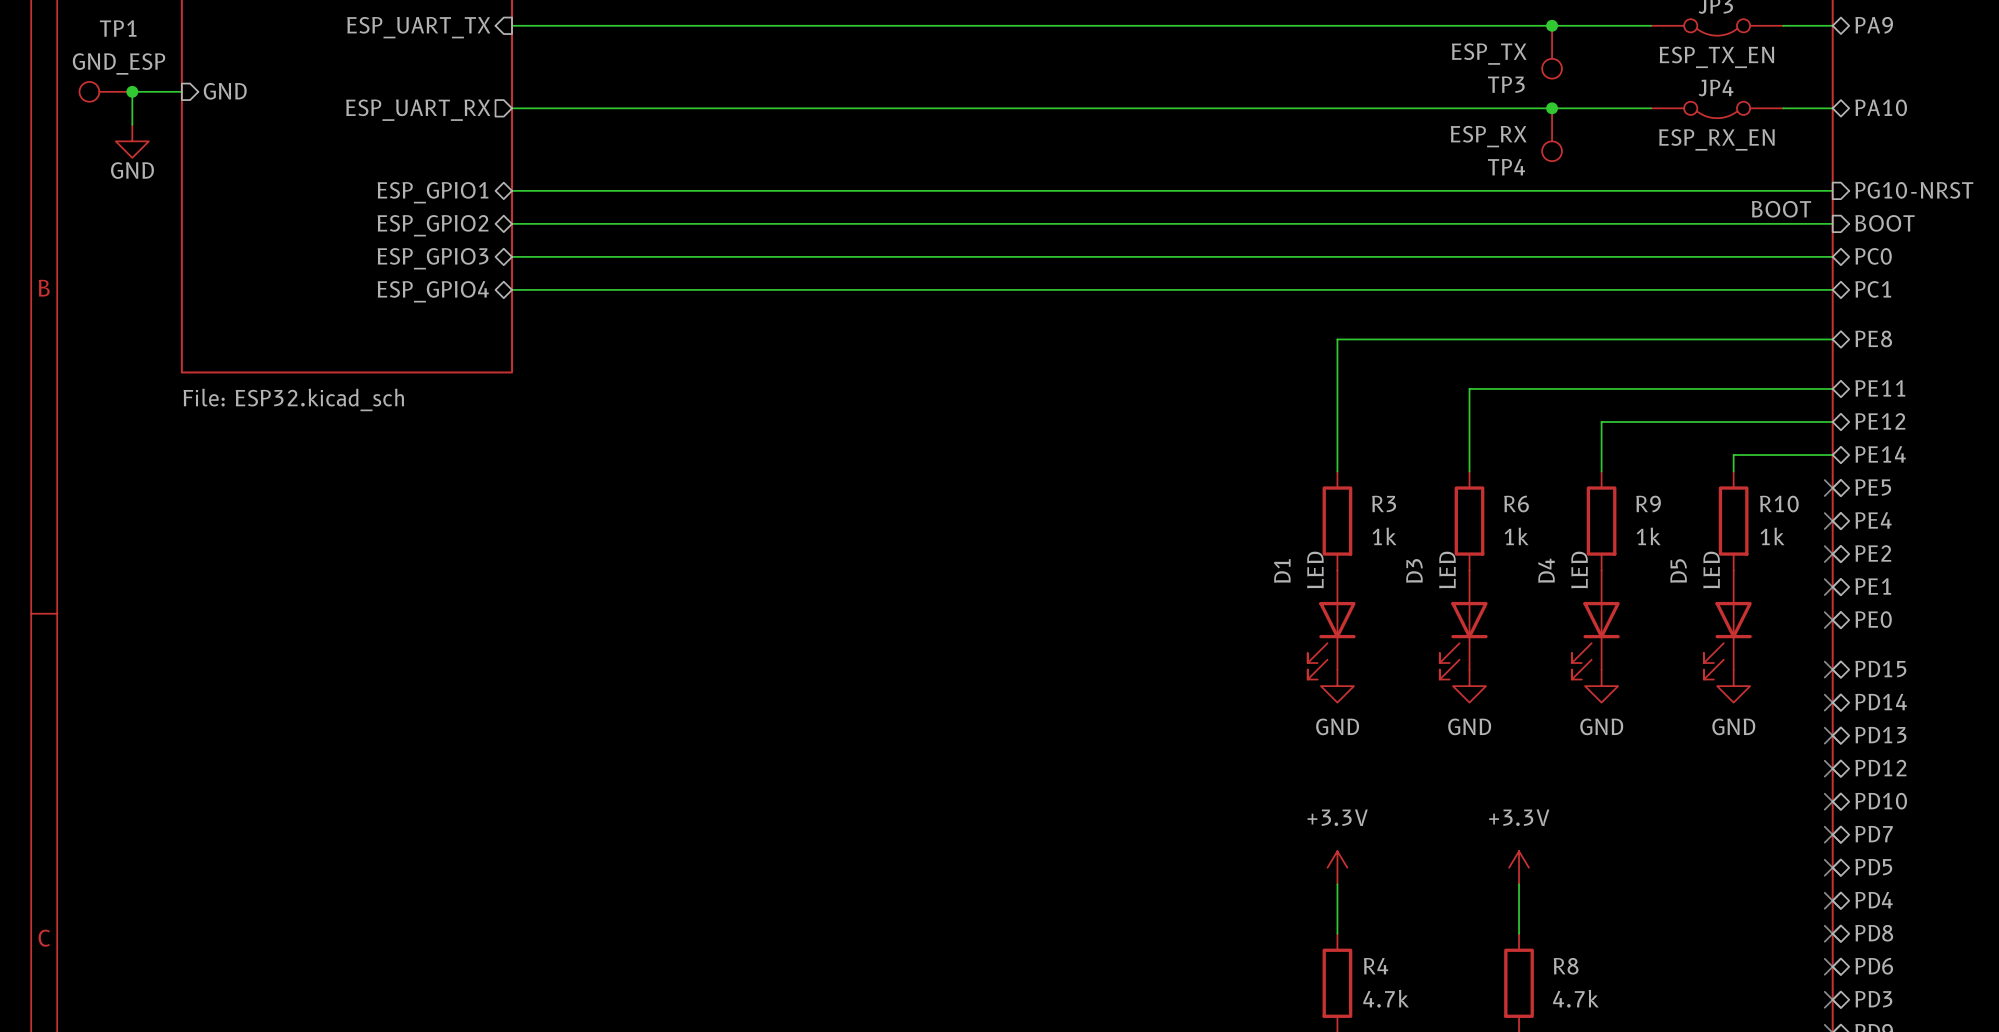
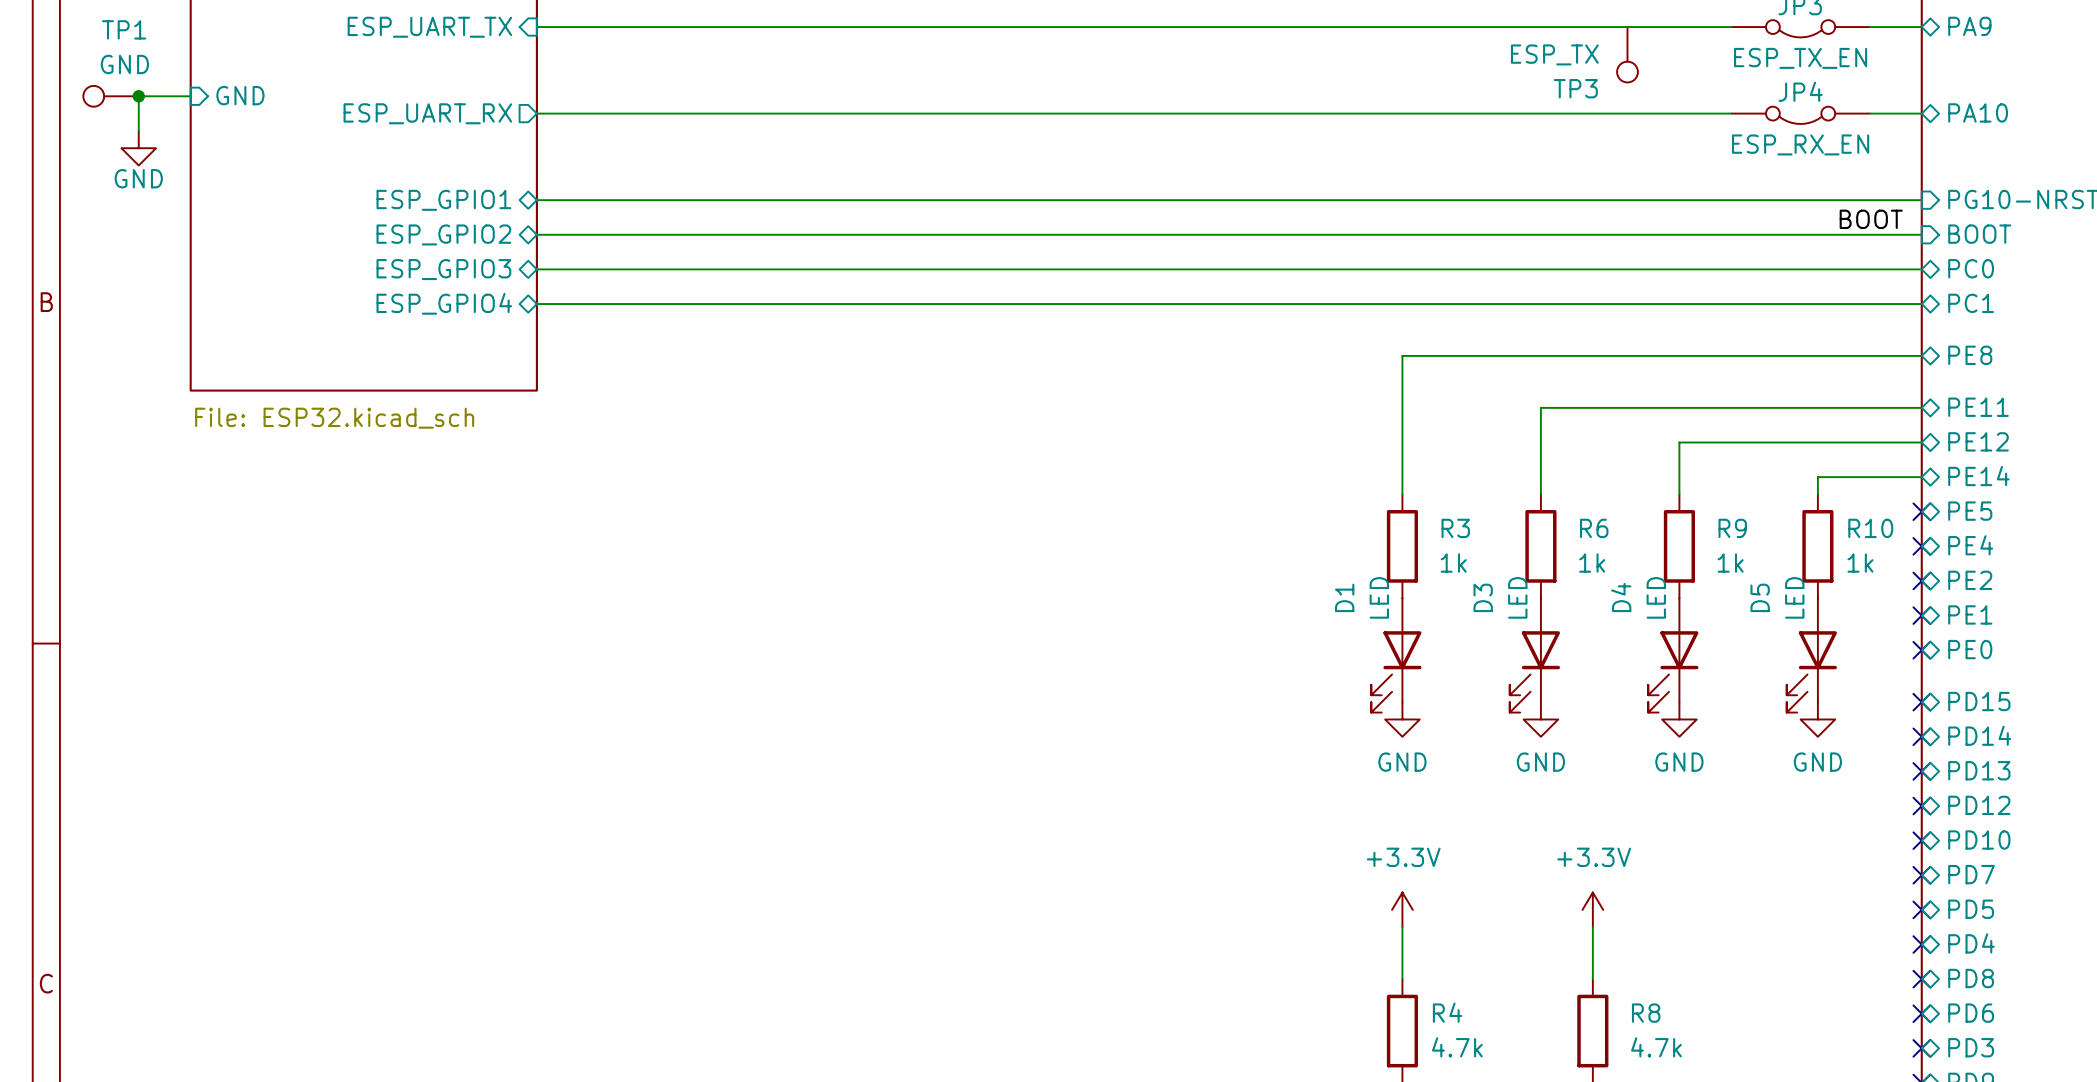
junction: (1552, 25) -> none
TP1 value: GND_ESP (119, 63) -> GND (124, 64)
junction: (1552, 108) -> none
TP4: ESP_RX (1552, 134) -> none

